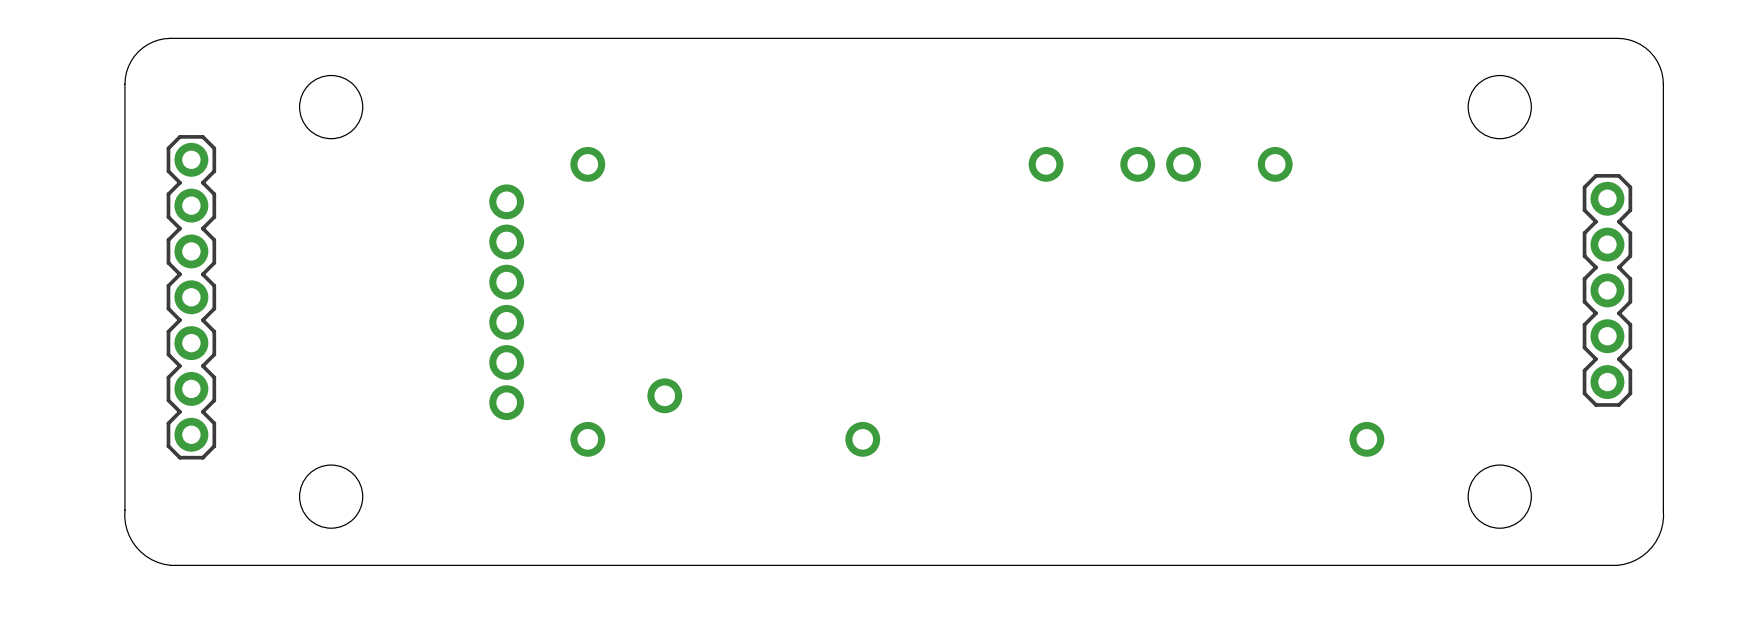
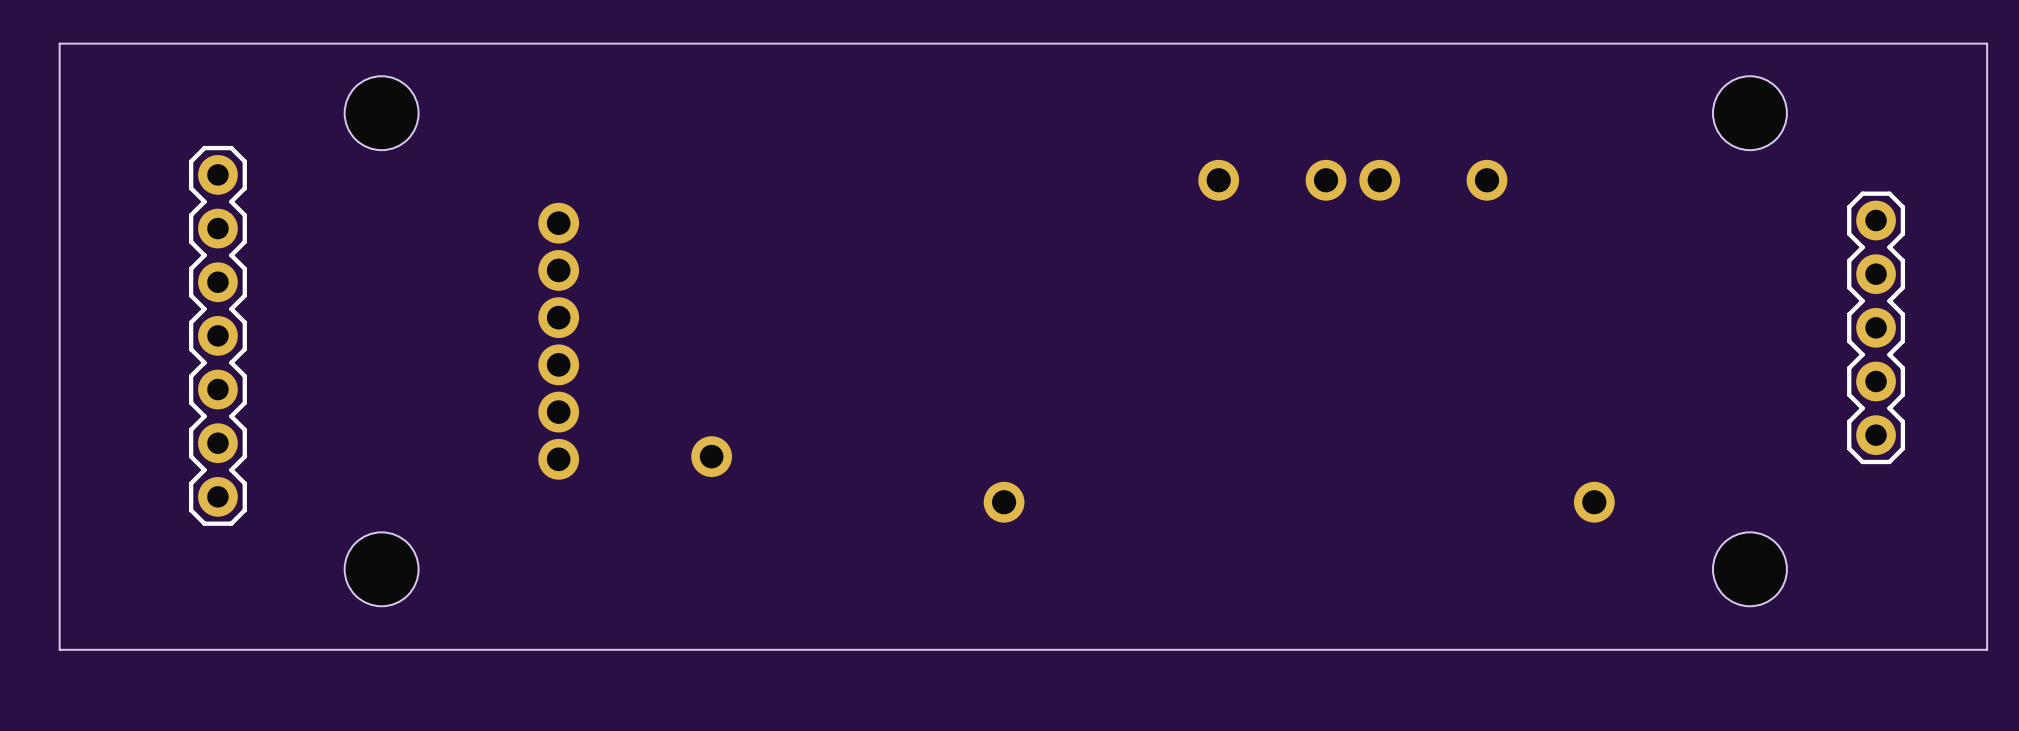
part: (587, 164) -> none
part: none -> (558, 223)
part: (506, 201) -> none
part: none -> (558, 270)
part: (506, 241) -> none
part: none -> (558, 317)
part: (506, 282) -> none
part: none -> (558, 364)
part: (506, 322) -> none
part: none -> (558, 412)
part: (506, 362) -> none
part: (664, 395) -> none
part: none -> (711, 456)
part: none -> (558, 459)
part: (506, 402) -> none
part: (587, 439) -> none
board edge: (170, 565) (151, 559) (136, 547) (127, 529) (124, 516) (125, 78) (128, 66) (138, 51) (153, 41) (170, 38) (1617, 38) (1635, 41) (1645, 47) (1653, 56) (1661, 72) (1663, 84) (1663, 516) (1661, 529) (1651, 547) (1636, 559) (1617, 565) -> (193, 649) (59, 649) (59, 43) (1987, 43) (1987, 649) (1887, 649)

